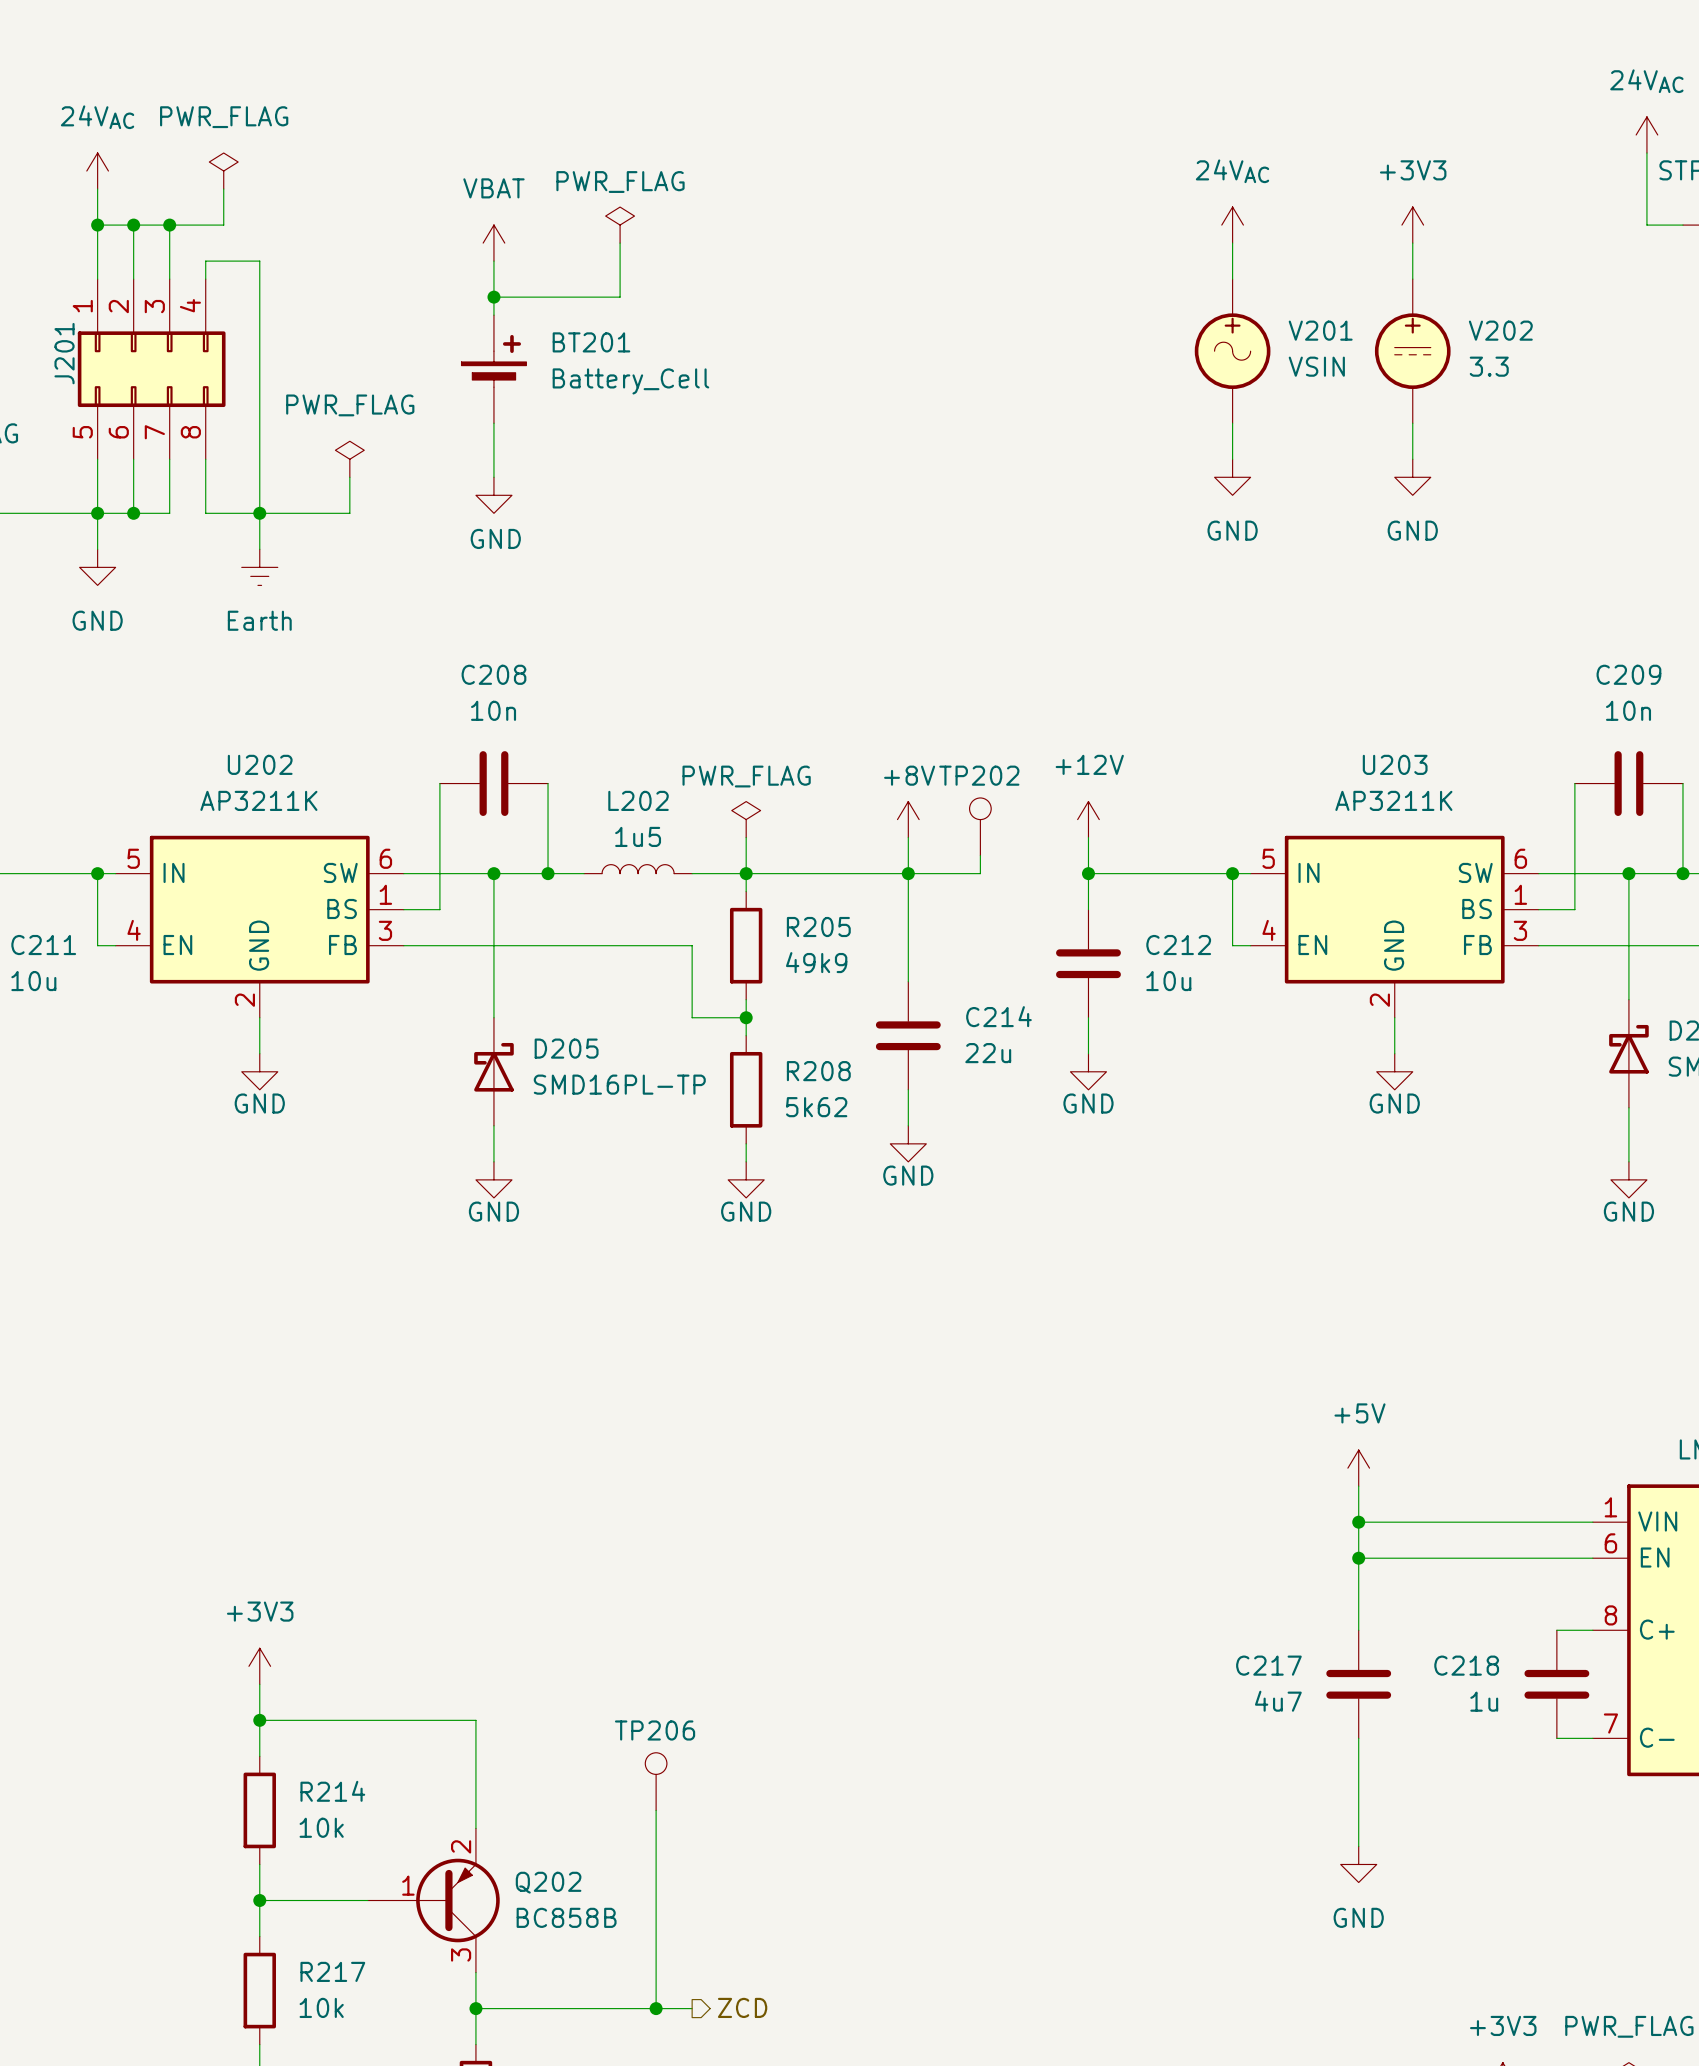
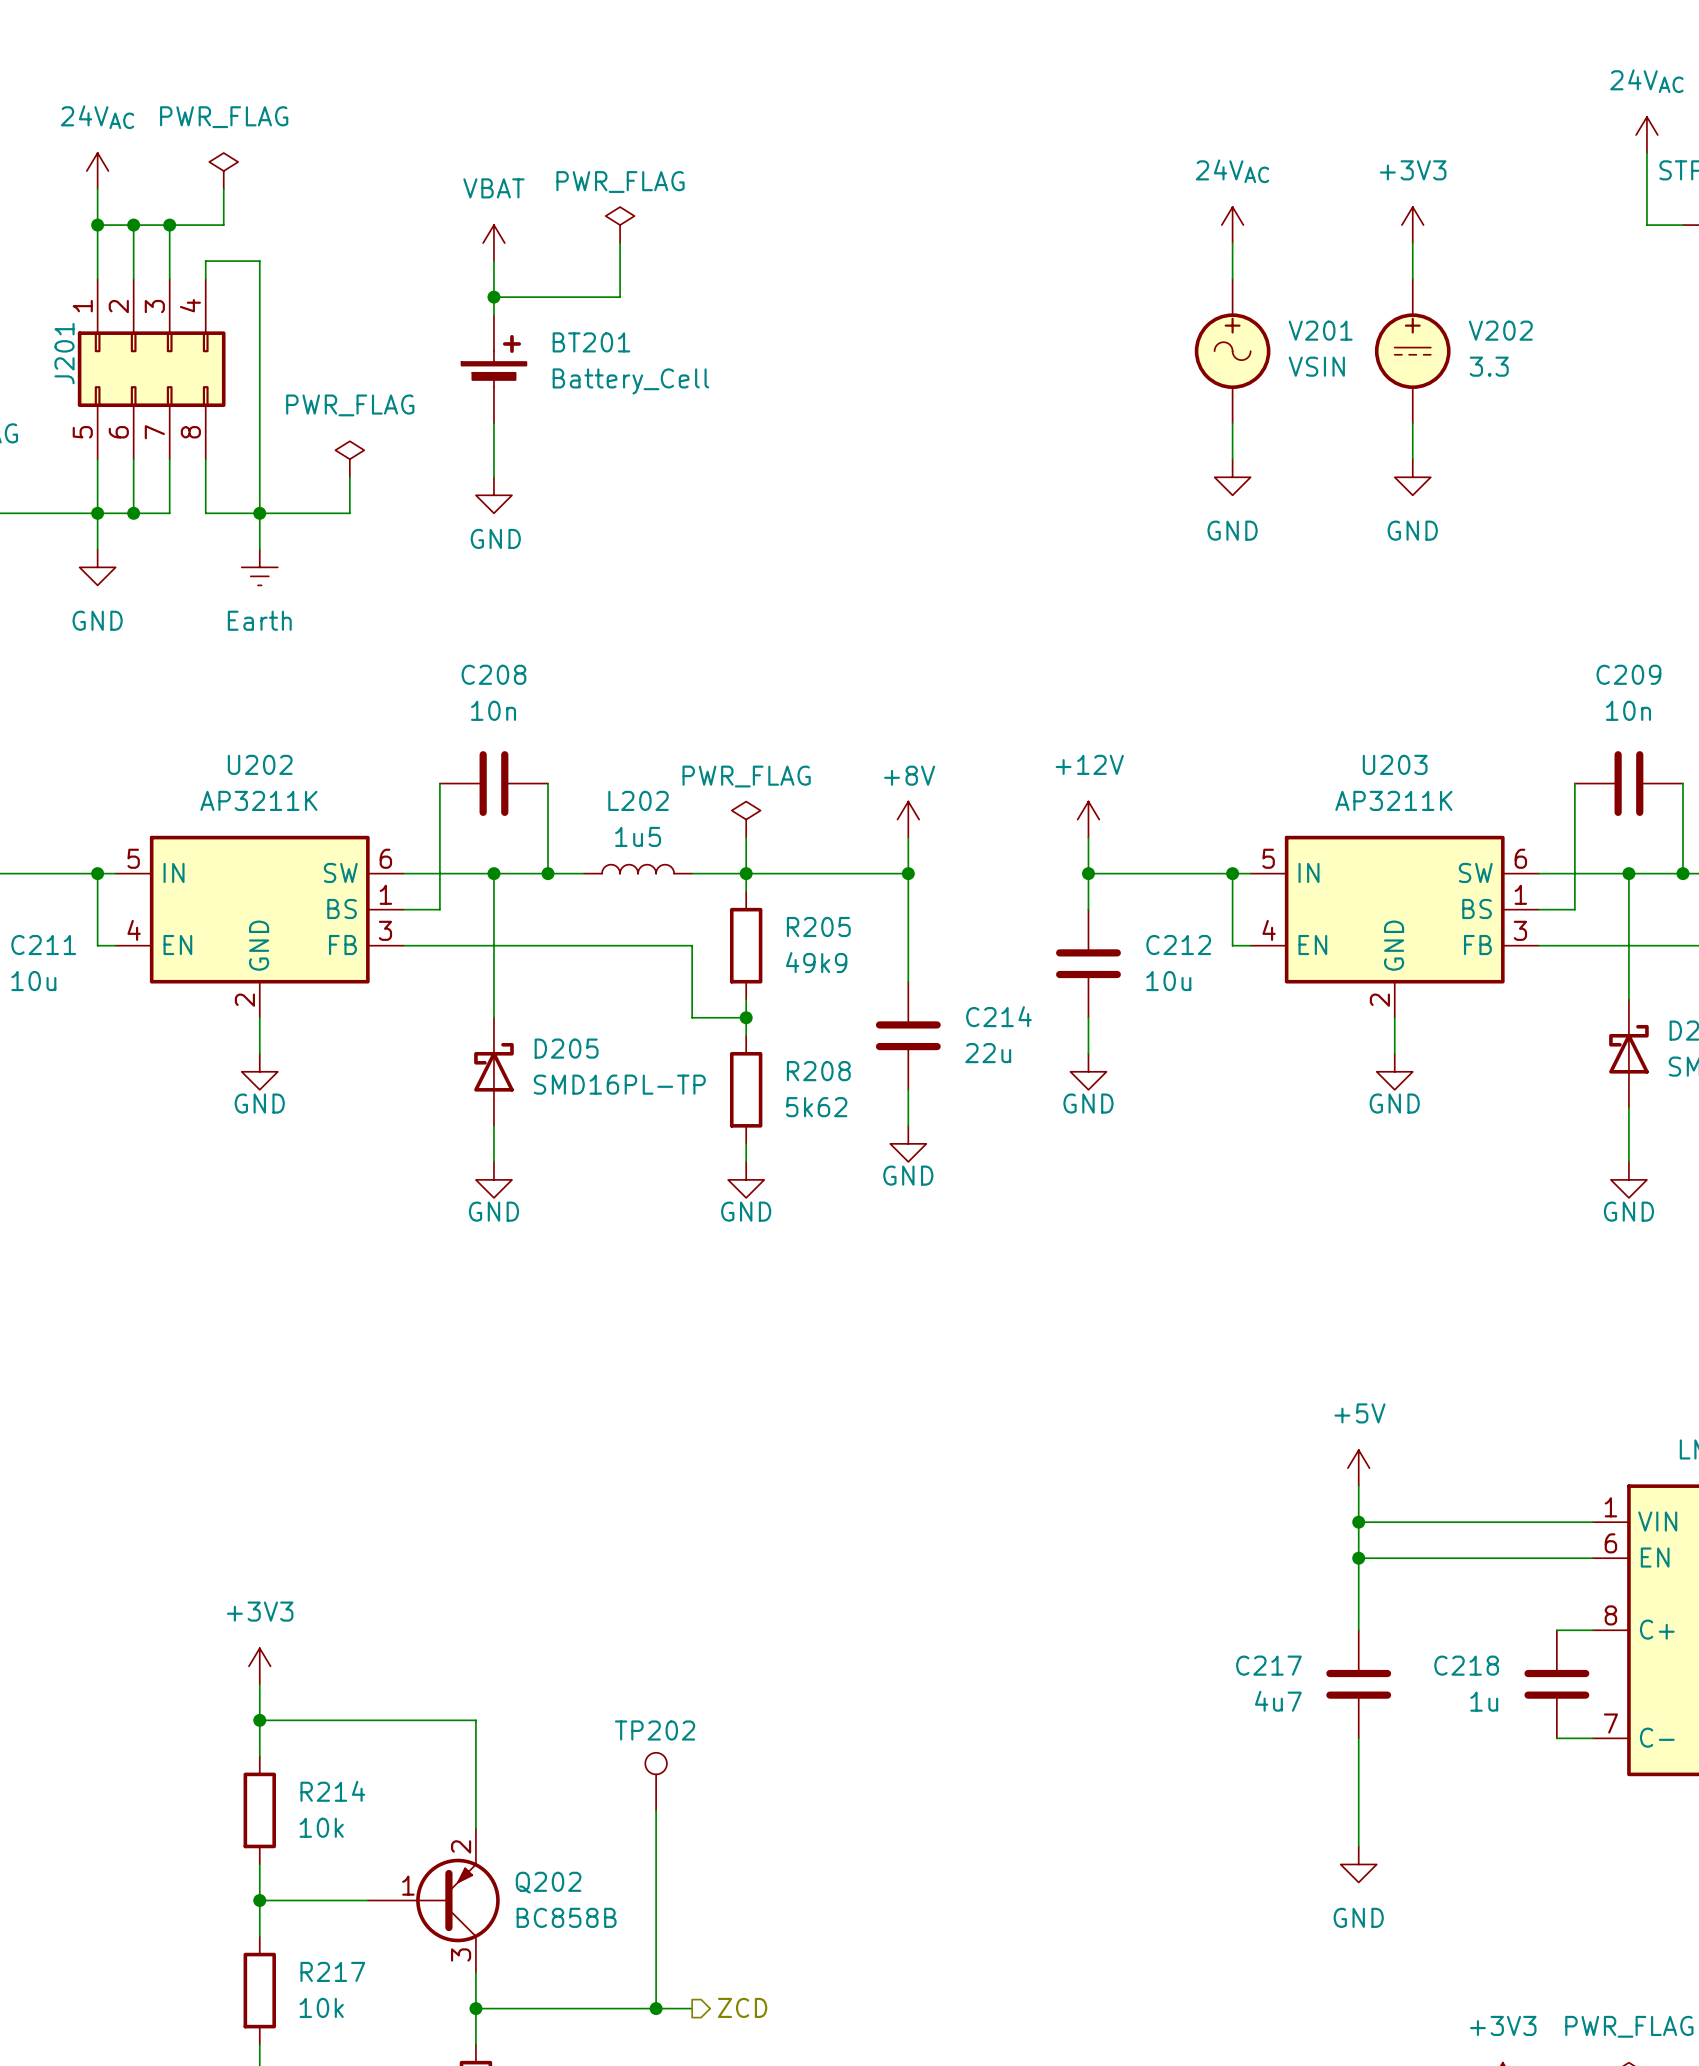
TP202: (980, 826) -> none
wire: (980, 855) (980, 873) (908, 873) -> none
TP206 name: TP206 (655, 1730) -> TP202 (655, 1730)

